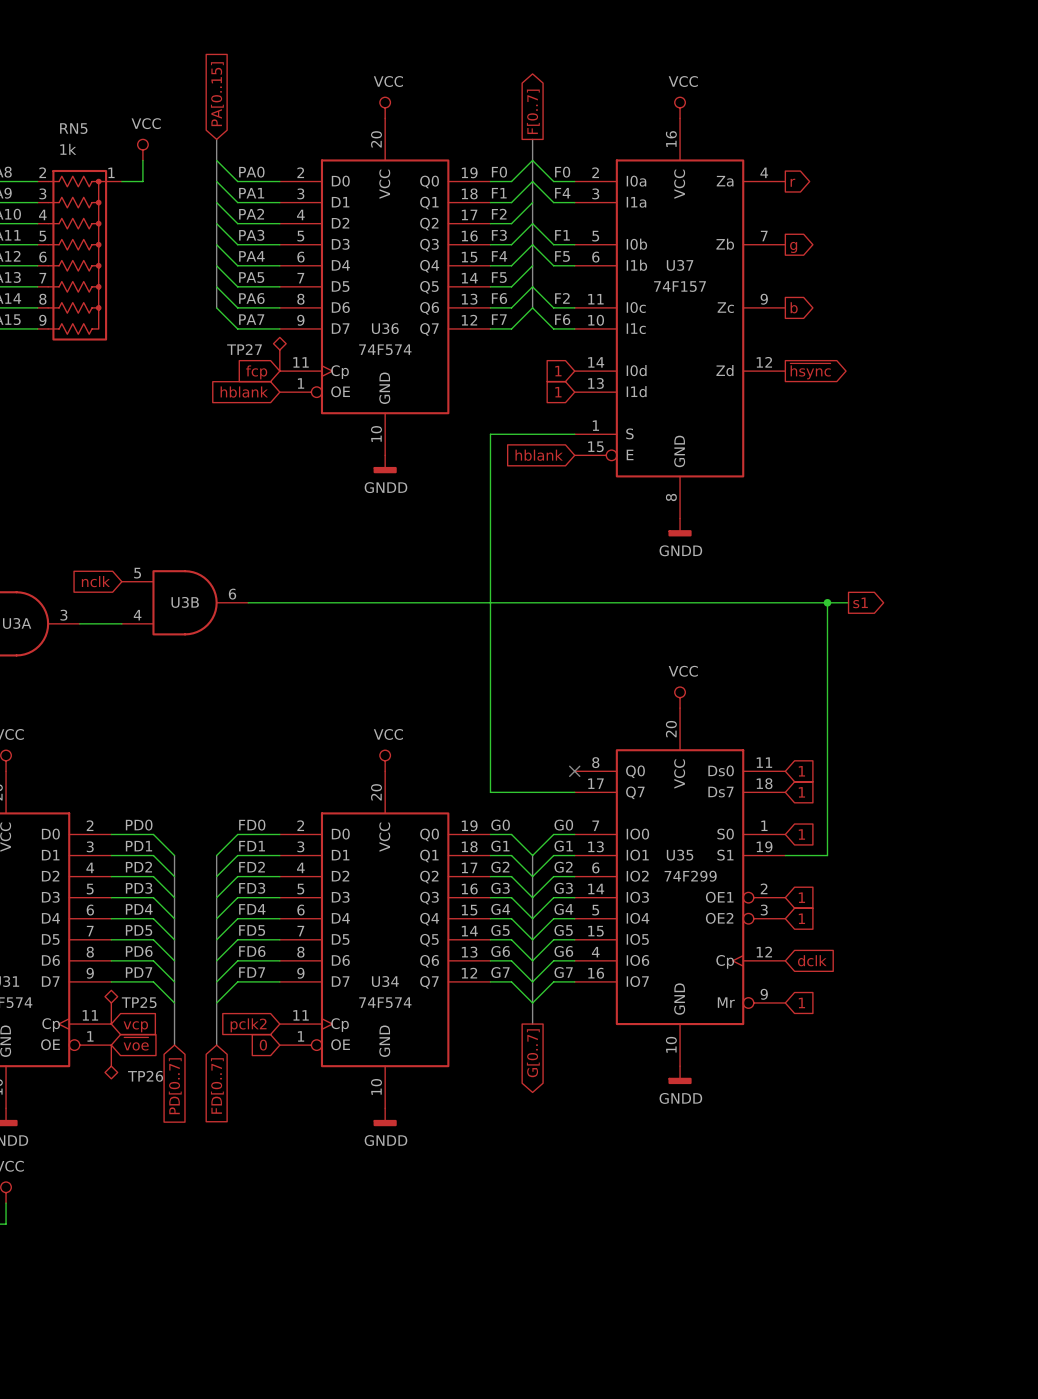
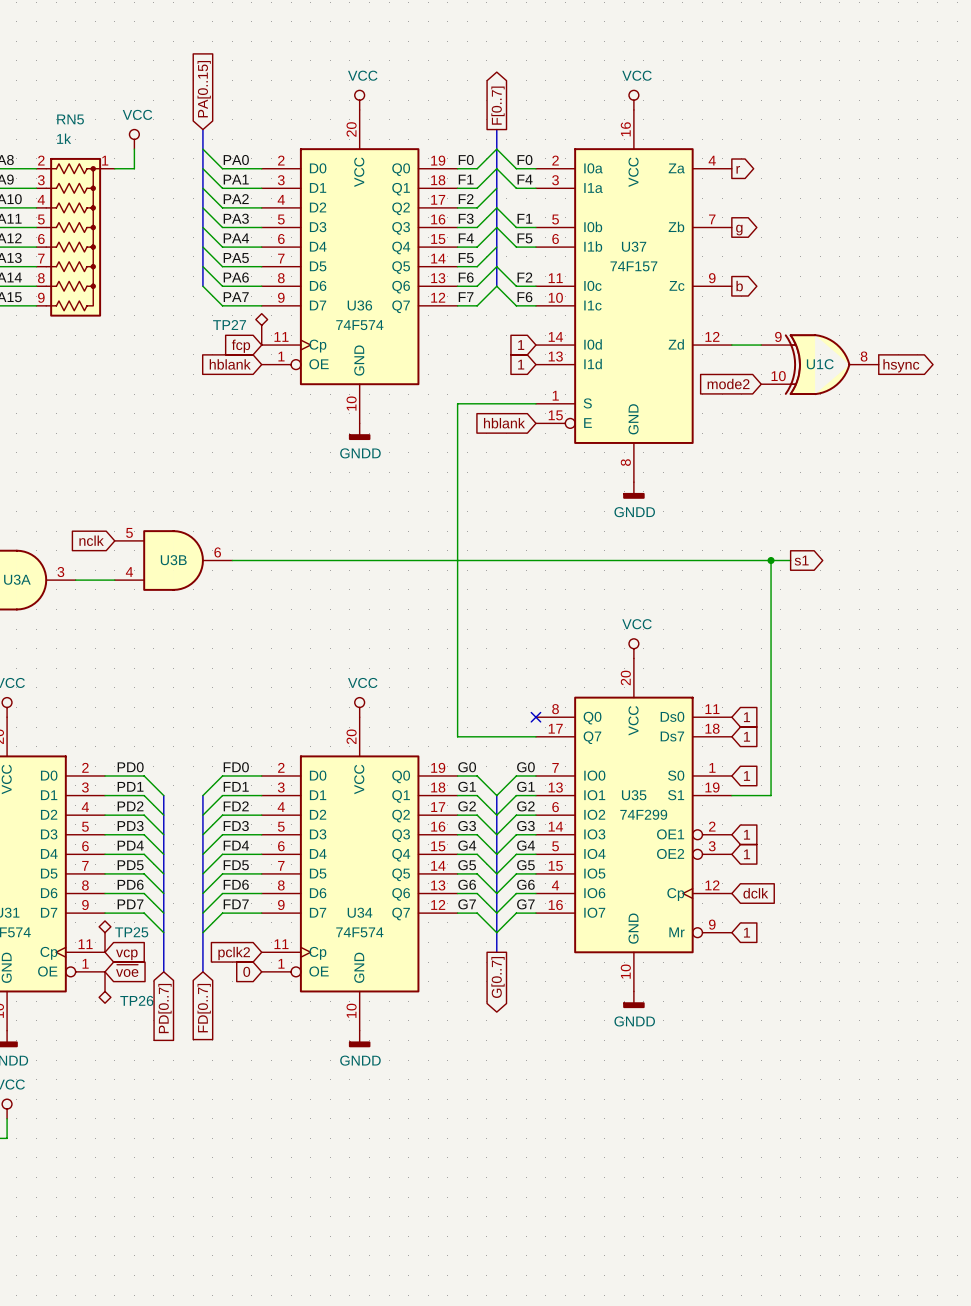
wire: none -> (731, 345) (761, 345)
global label: ~{hsync} (810, 371) -> none
U1C: none -> (820, 364)
global label: none -> hsync (901, 365)
global label: none -> mode2 (728, 384)

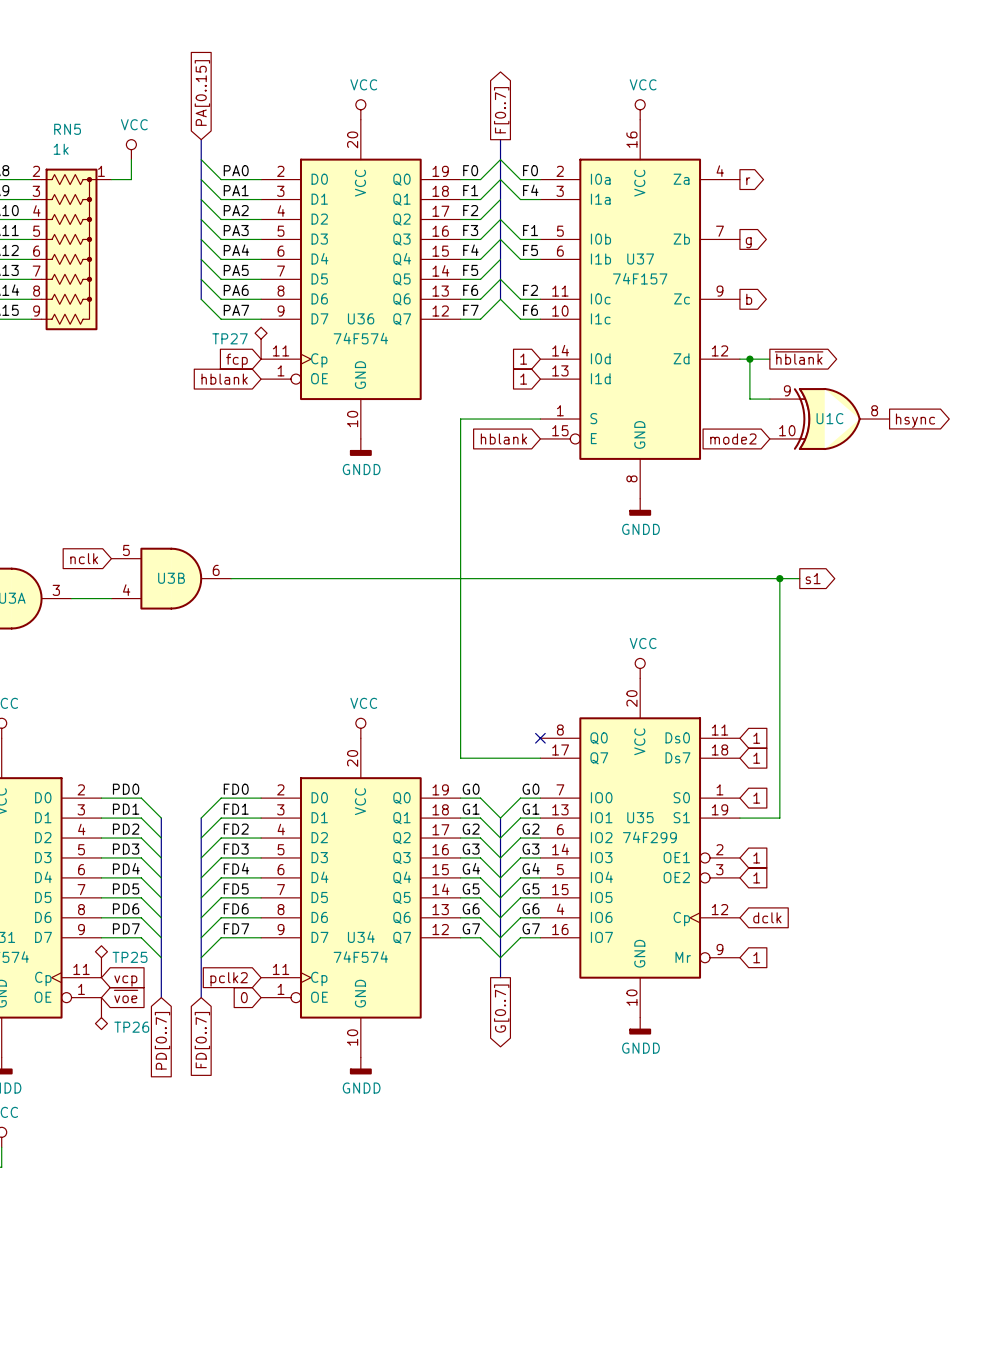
global label: none -> ~{hblank} (799, 358)
wire: none -> (749, 359) (749, 399) (769, 399)
junction: none -> (749, 359)
U1C position: (820, 364) -> (829, 419)
global label position: hsync (901, 365) -> hsync (915, 420)
global label position: mode2 (728, 384) -> mode2 (733, 438)

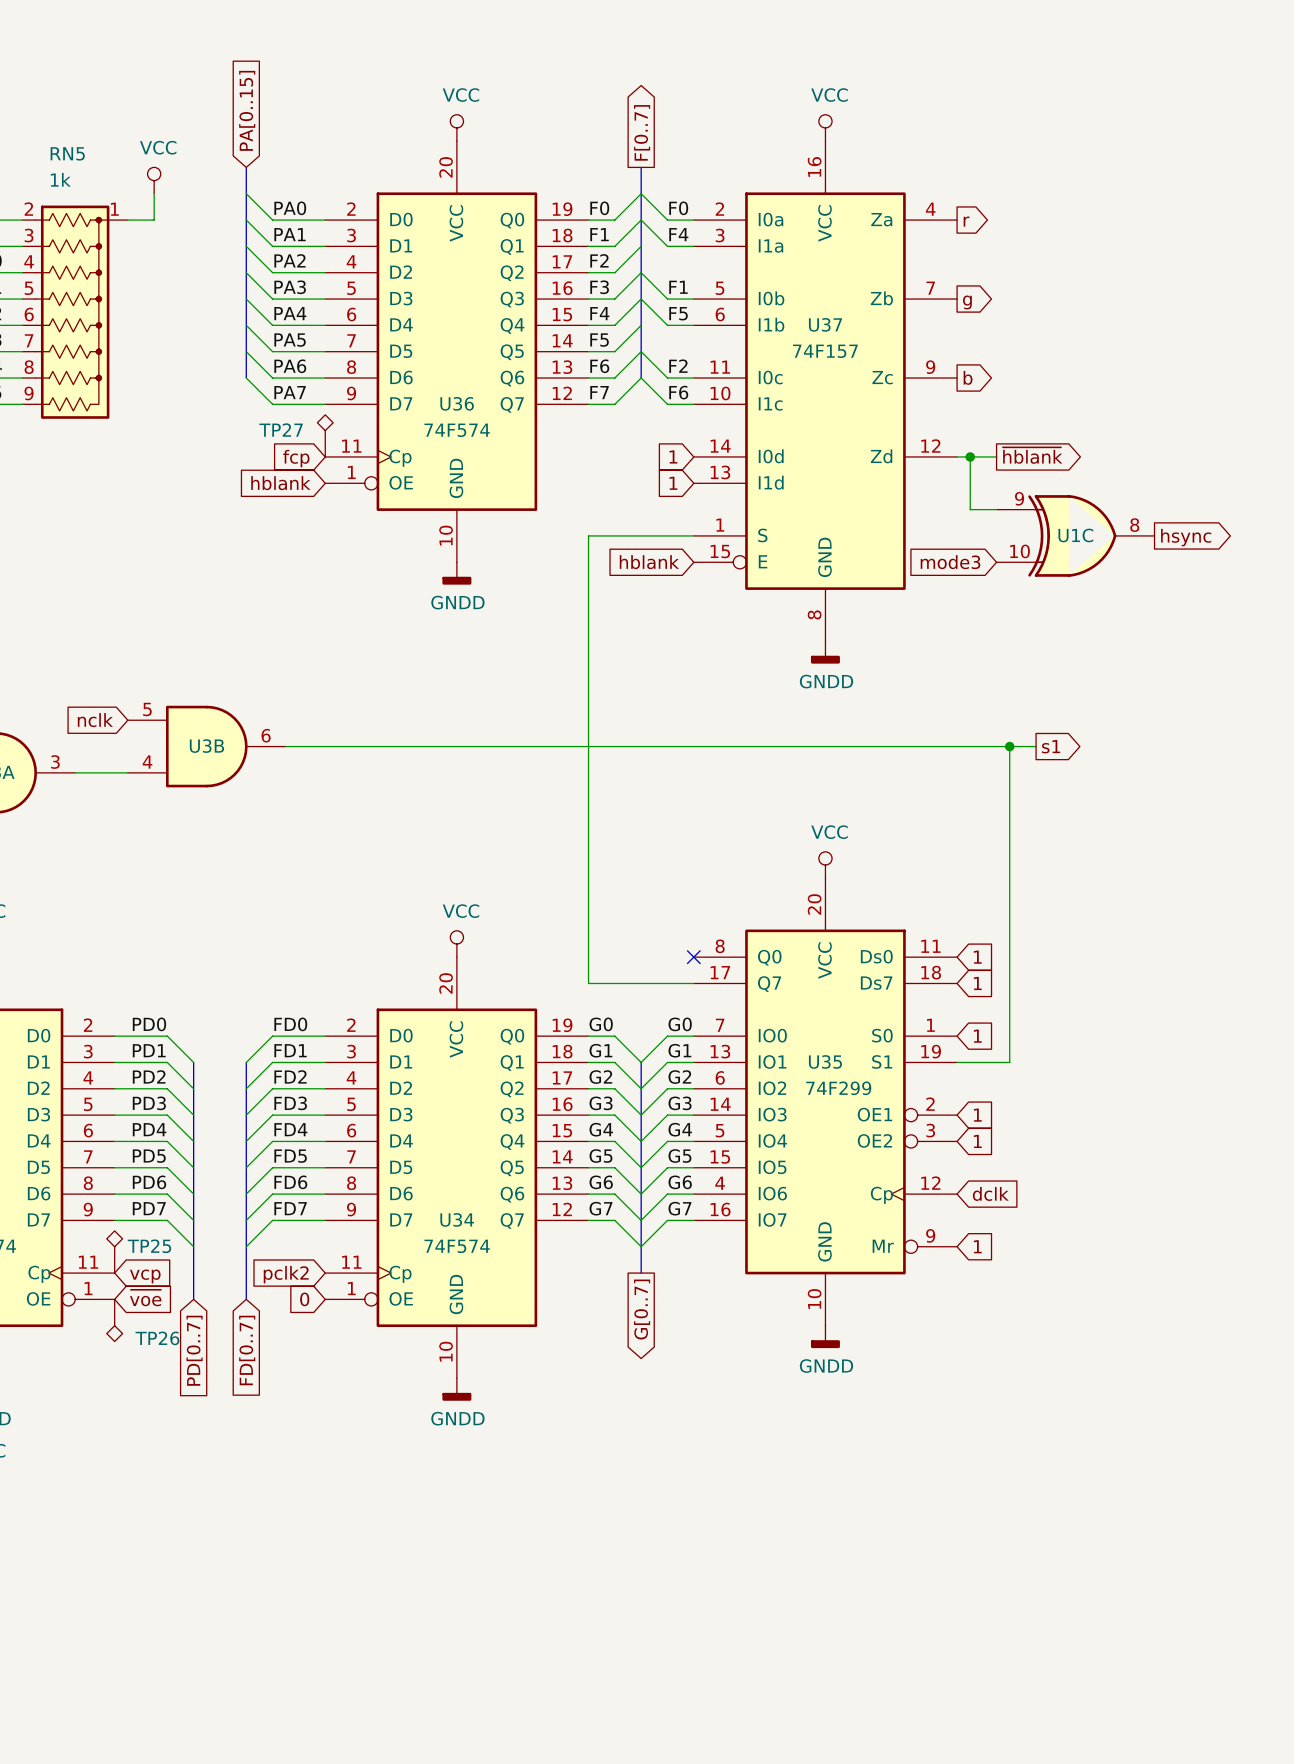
global label: mode2 (733, 438) -> mode3 (950, 562)

